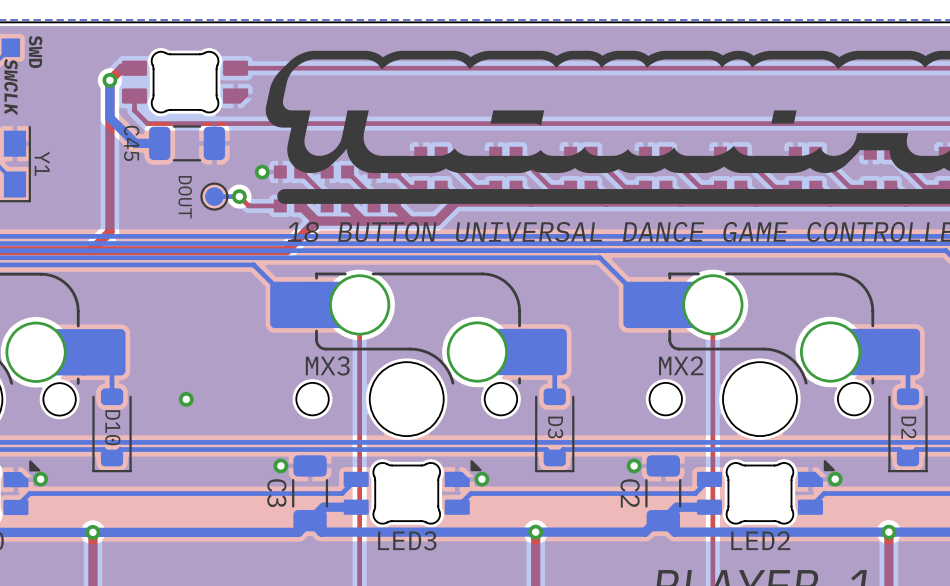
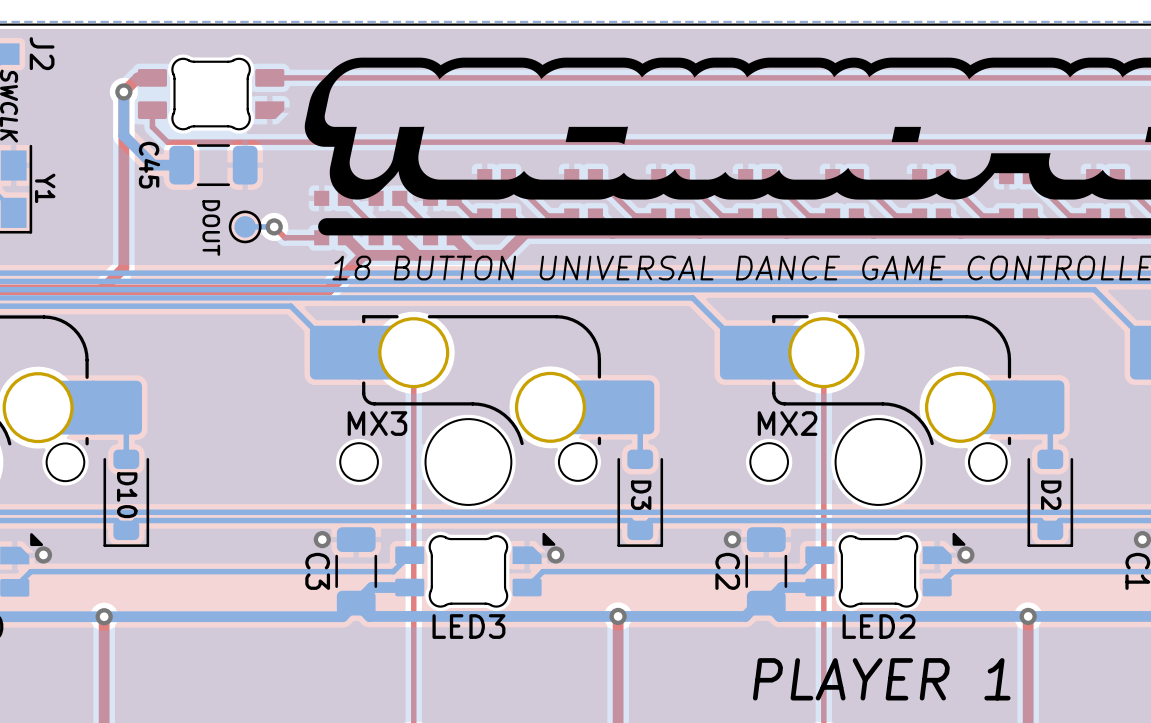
J2 name: none -> J2 (42, 53)
text: SWD (35, 51) -> none
via: (262, 172) -> none
via: (186, 399) -> none

